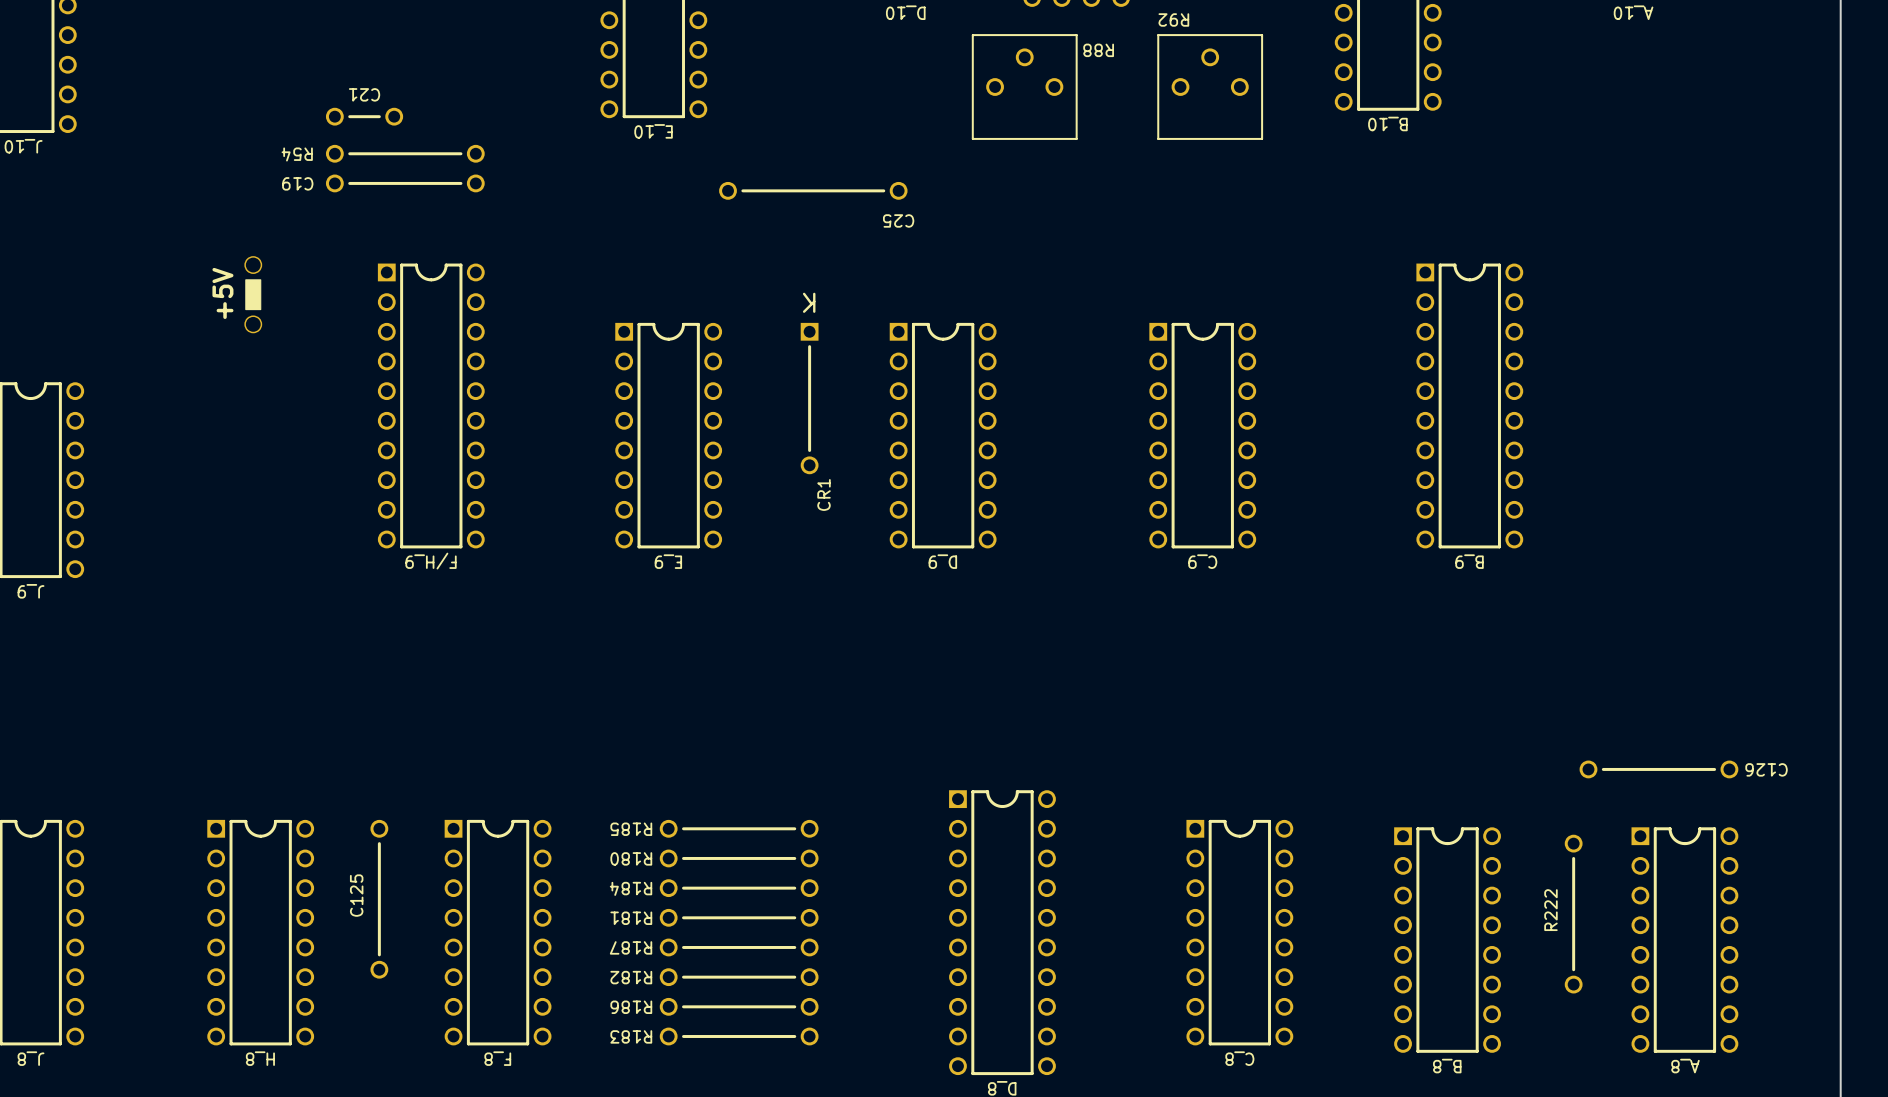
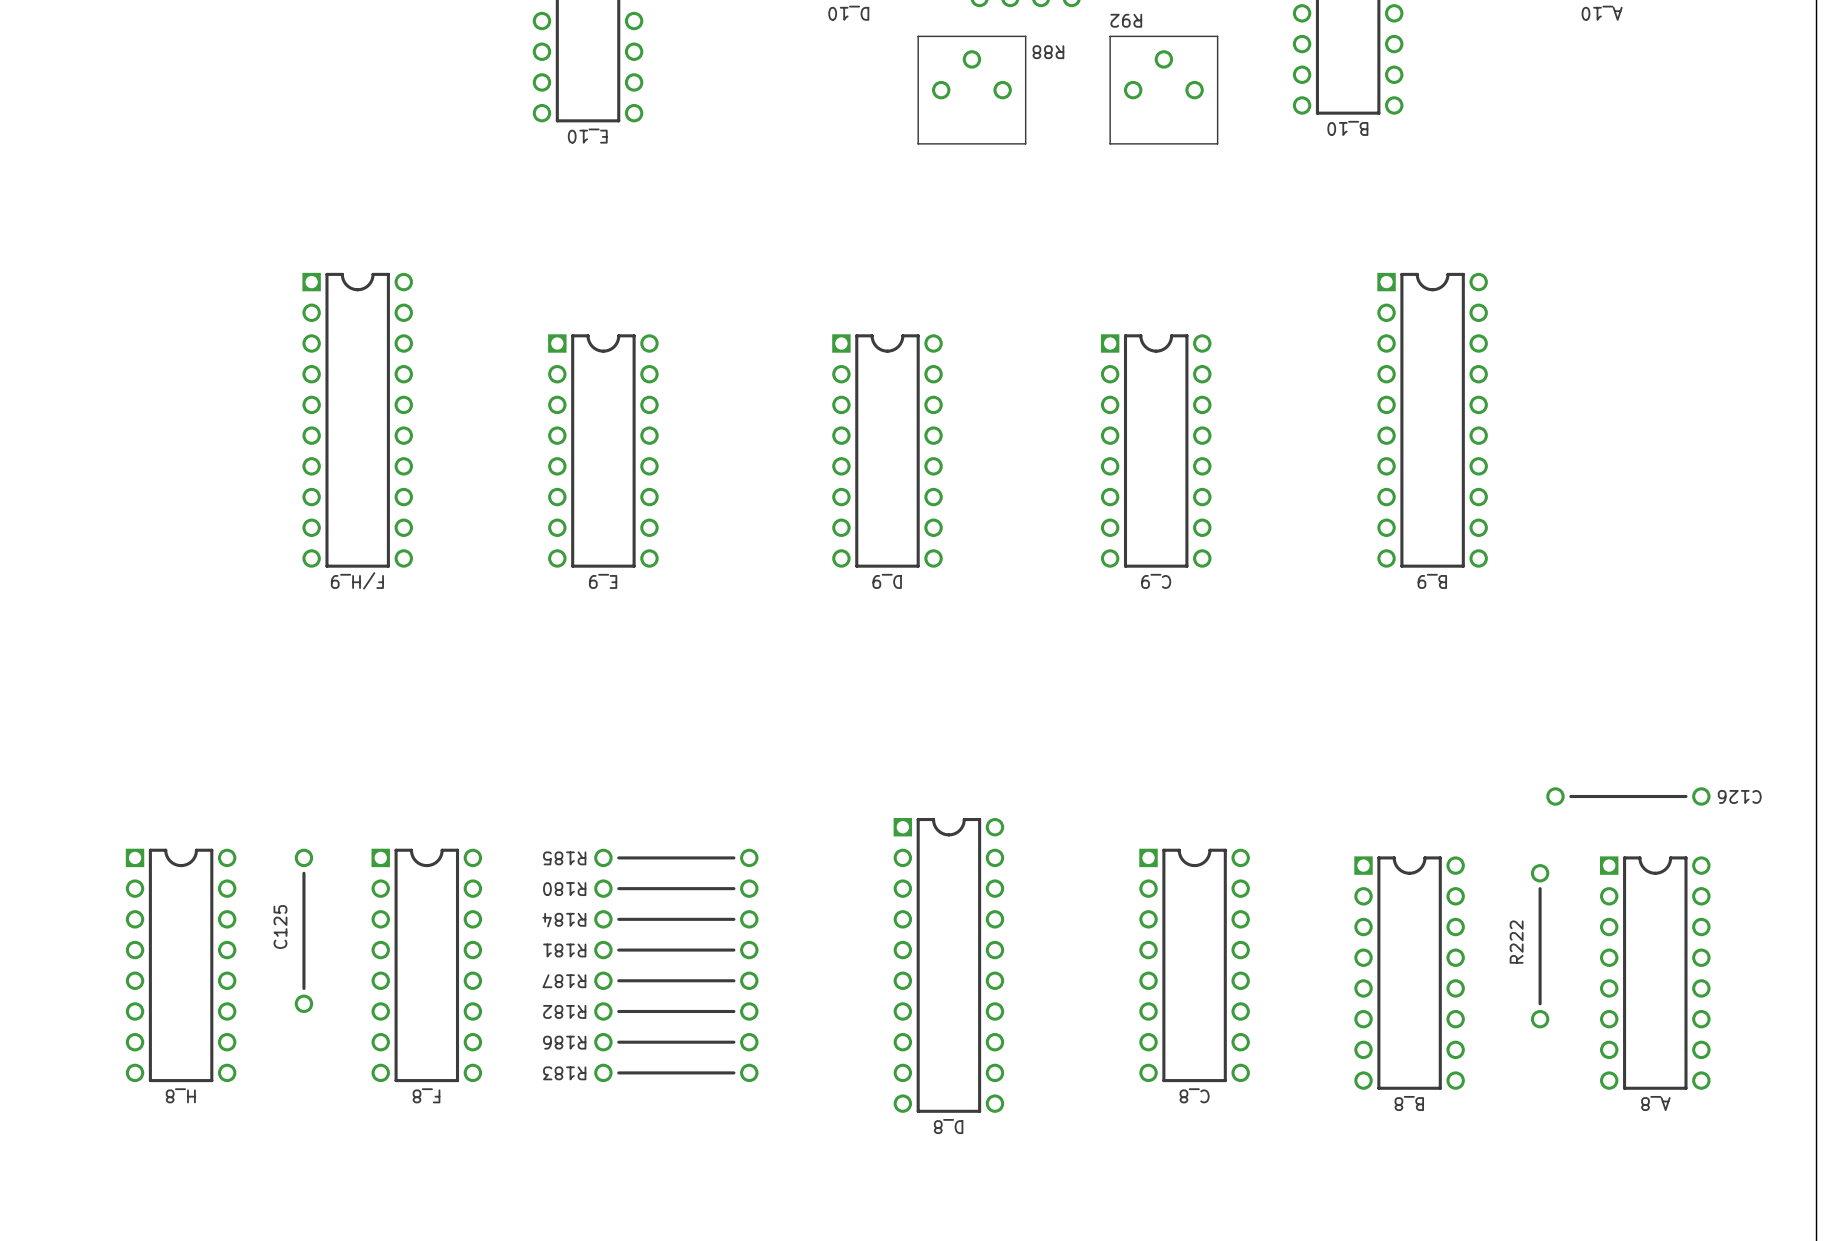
C21: (364, 116) -> none
R54: (405, 153) -> none
C19: (405, 183) -> none
C25: (813, 190) -> none
text: +5V (222, 293) -> none
part: (253, 294) -> none
CR1: (809, 398) -> none

